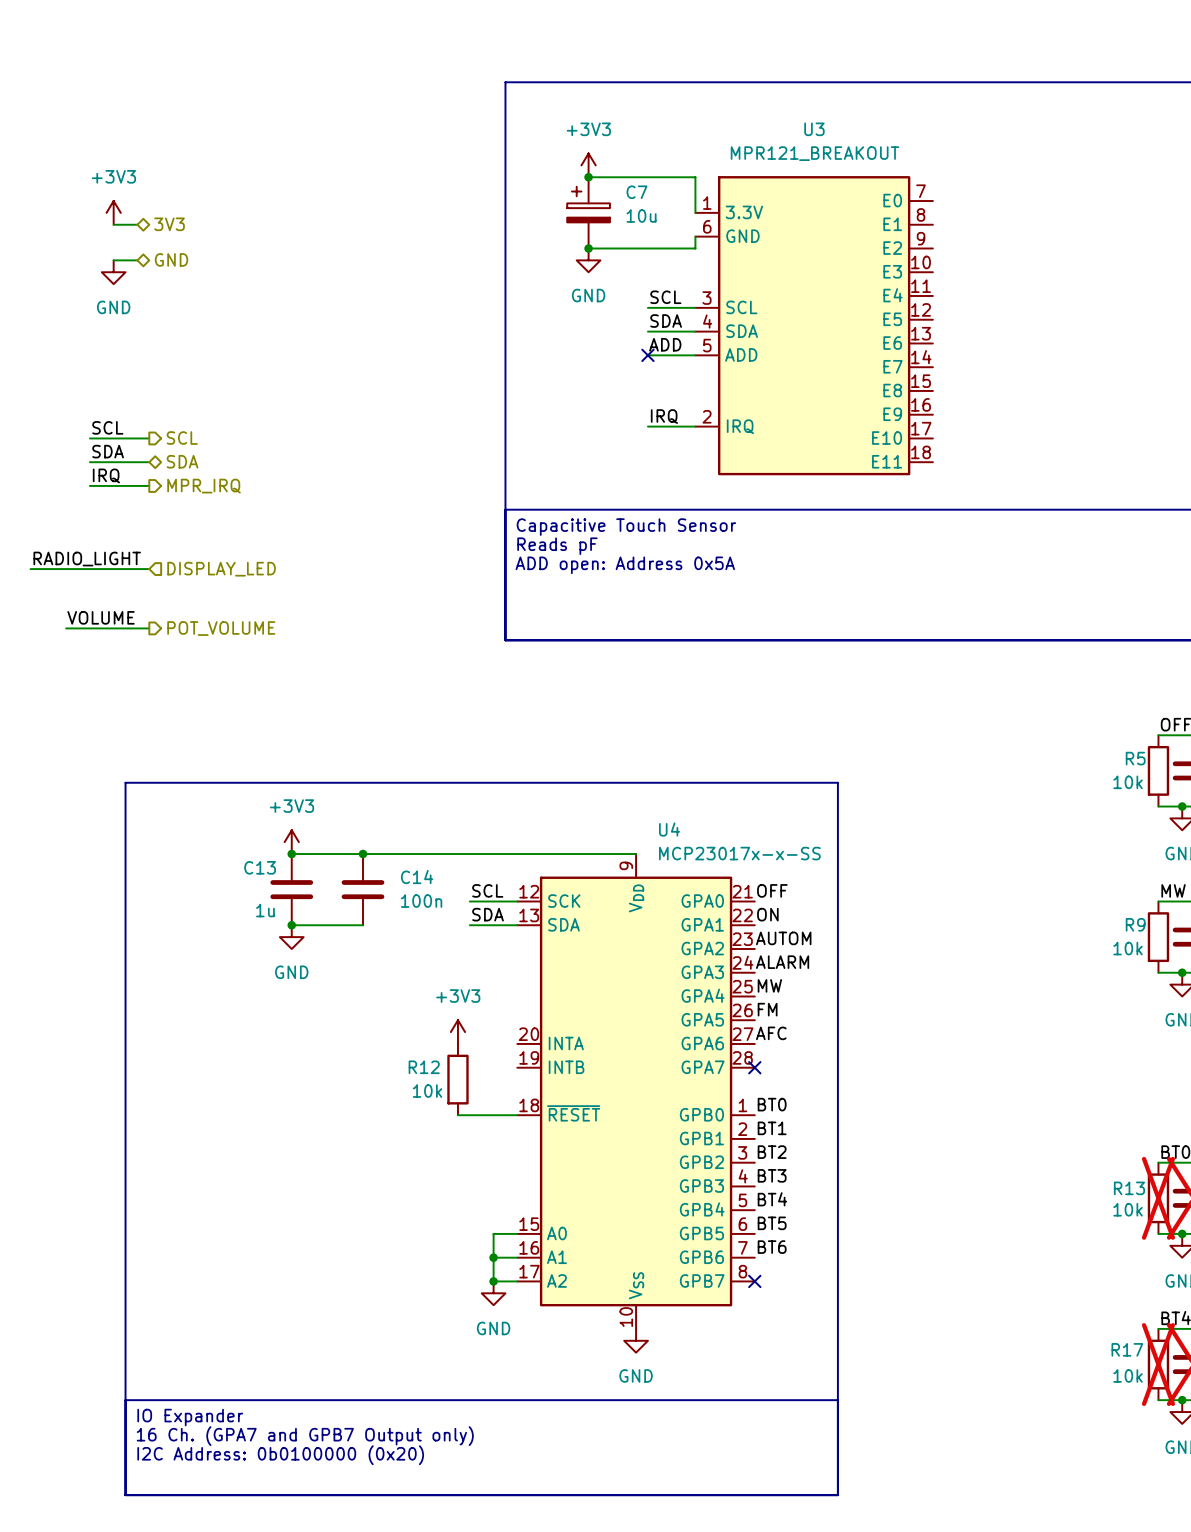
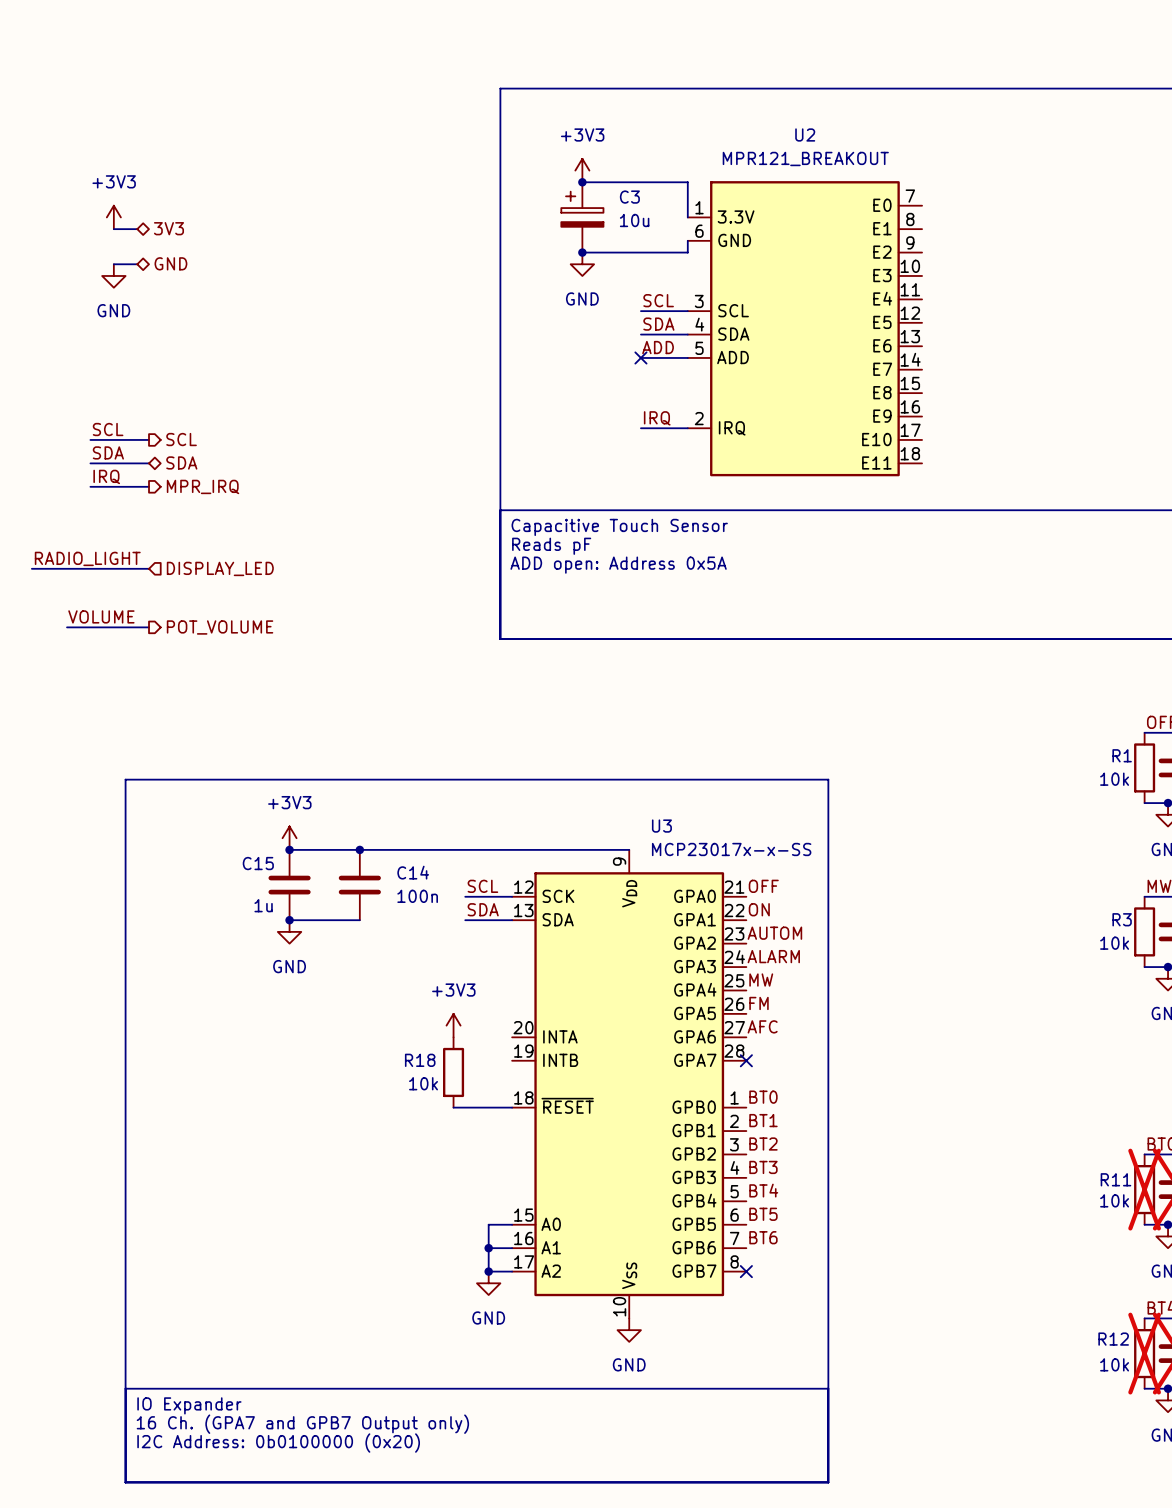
U3 name: U3 (814, 129) -> U2 (805, 134)
C7 name: C7 (637, 192) -> C3 (629, 197)
R5 name: R5 (1135, 758) -> R1 (1122, 755)
U4 name: U4 (669, 829) -> U3 (661, 826)
C13 name: C13 (260, 867) -> C15 (258, 863)
R9 name: R9 (1135, 924) -> R3 (1122, 919)
R12 name: R12 (424, 1067) -> R18 (420, 1060)
R13 name: R13 (1129, 1188) -> R11 (1115, 1179)
R17 name: R17 (1127, 1349) -> R12 (1113, 1339)

